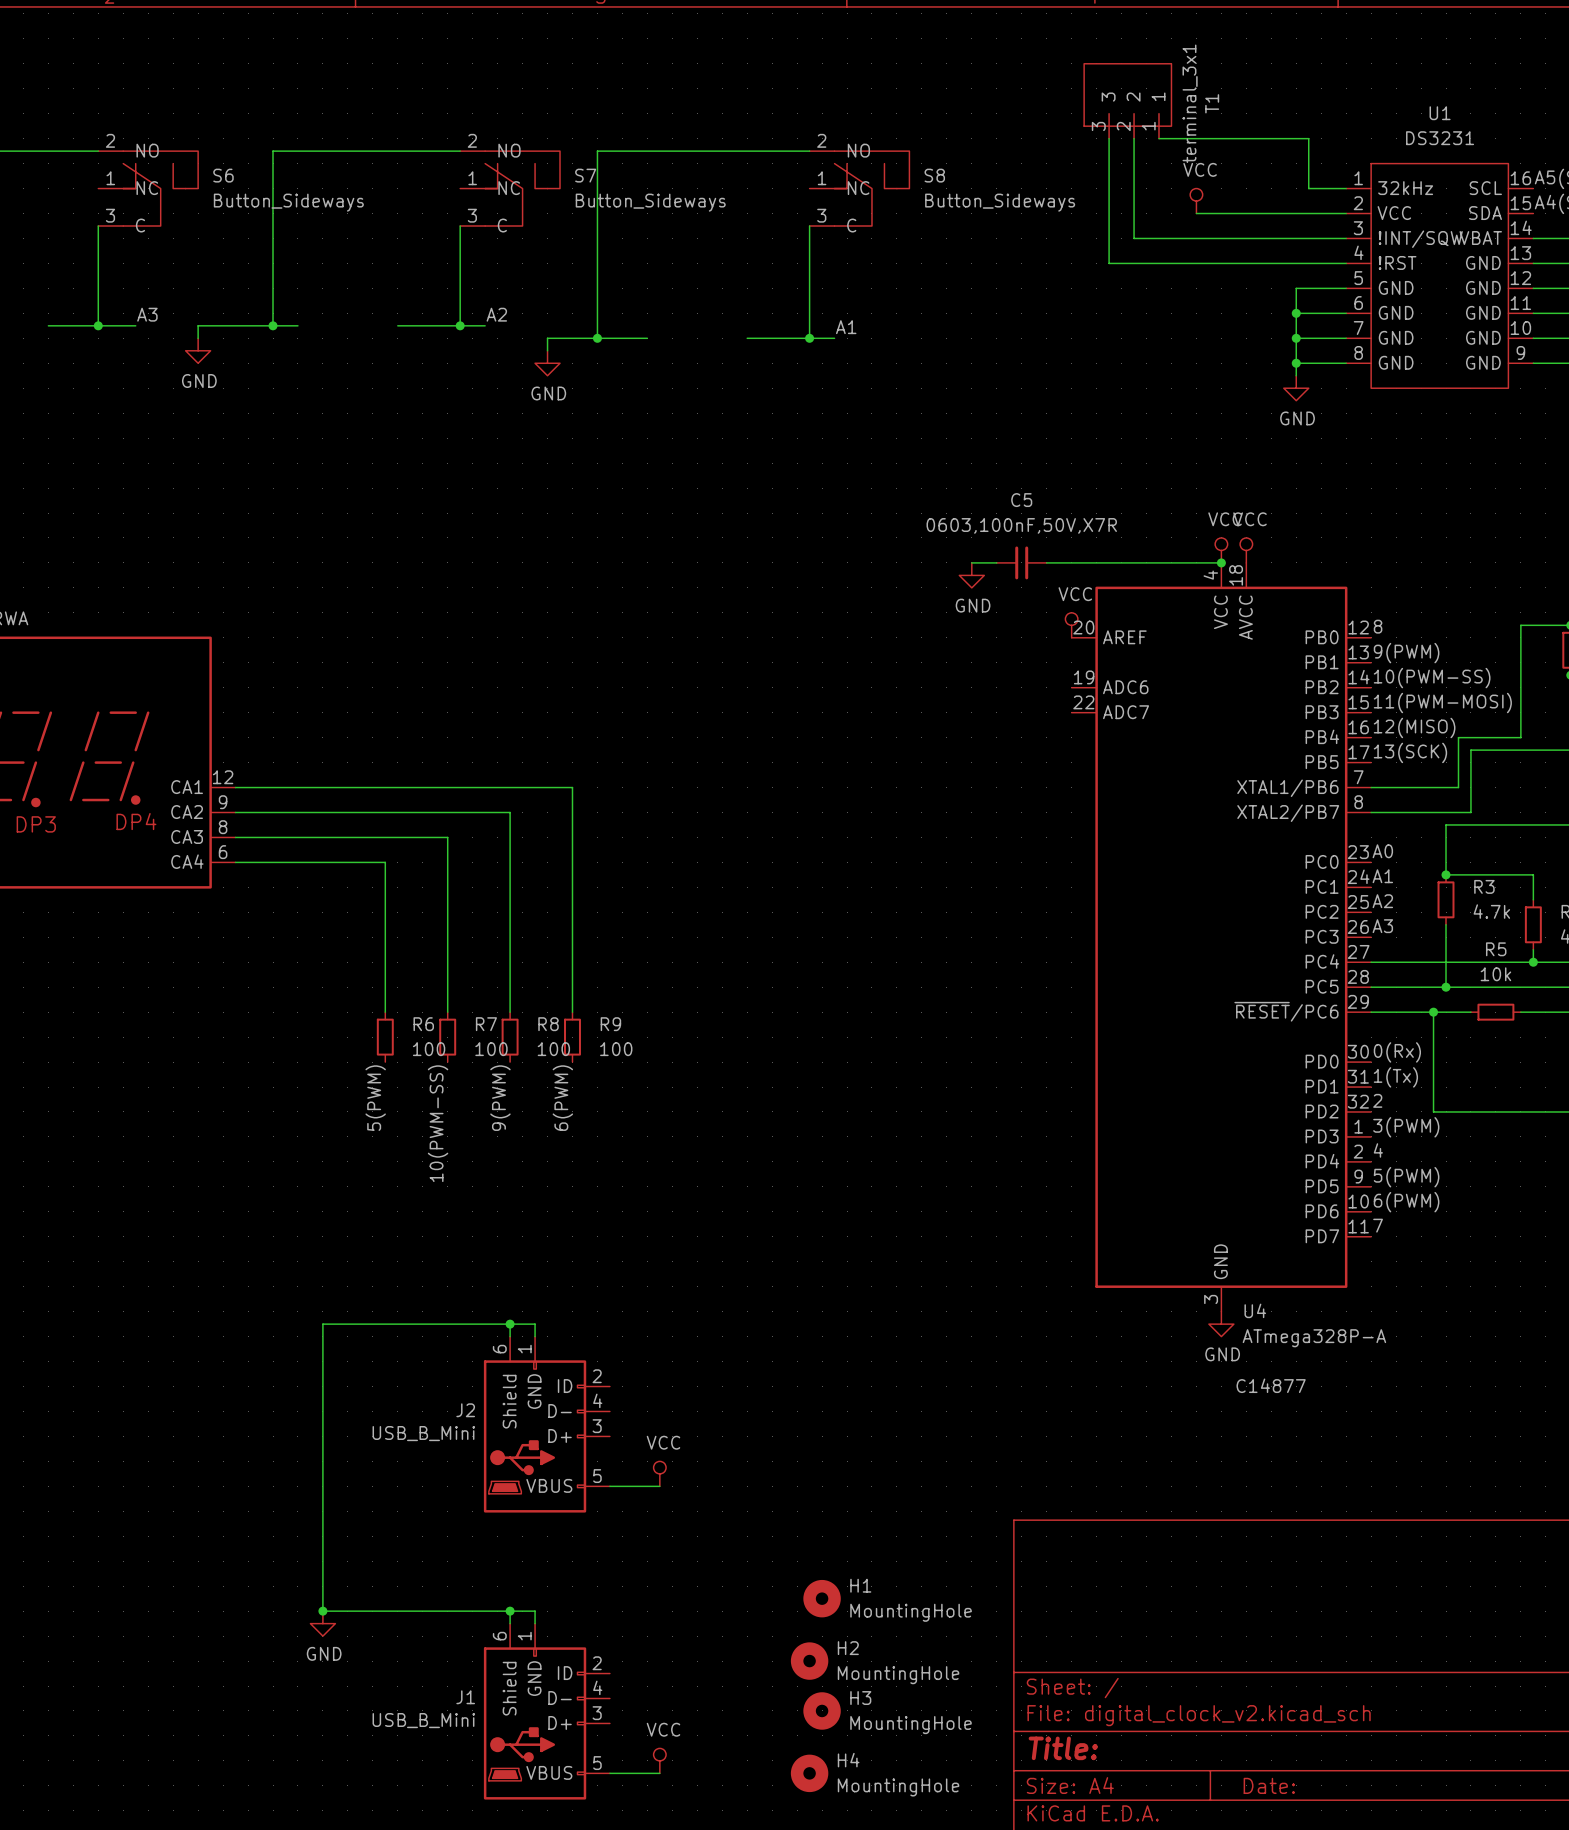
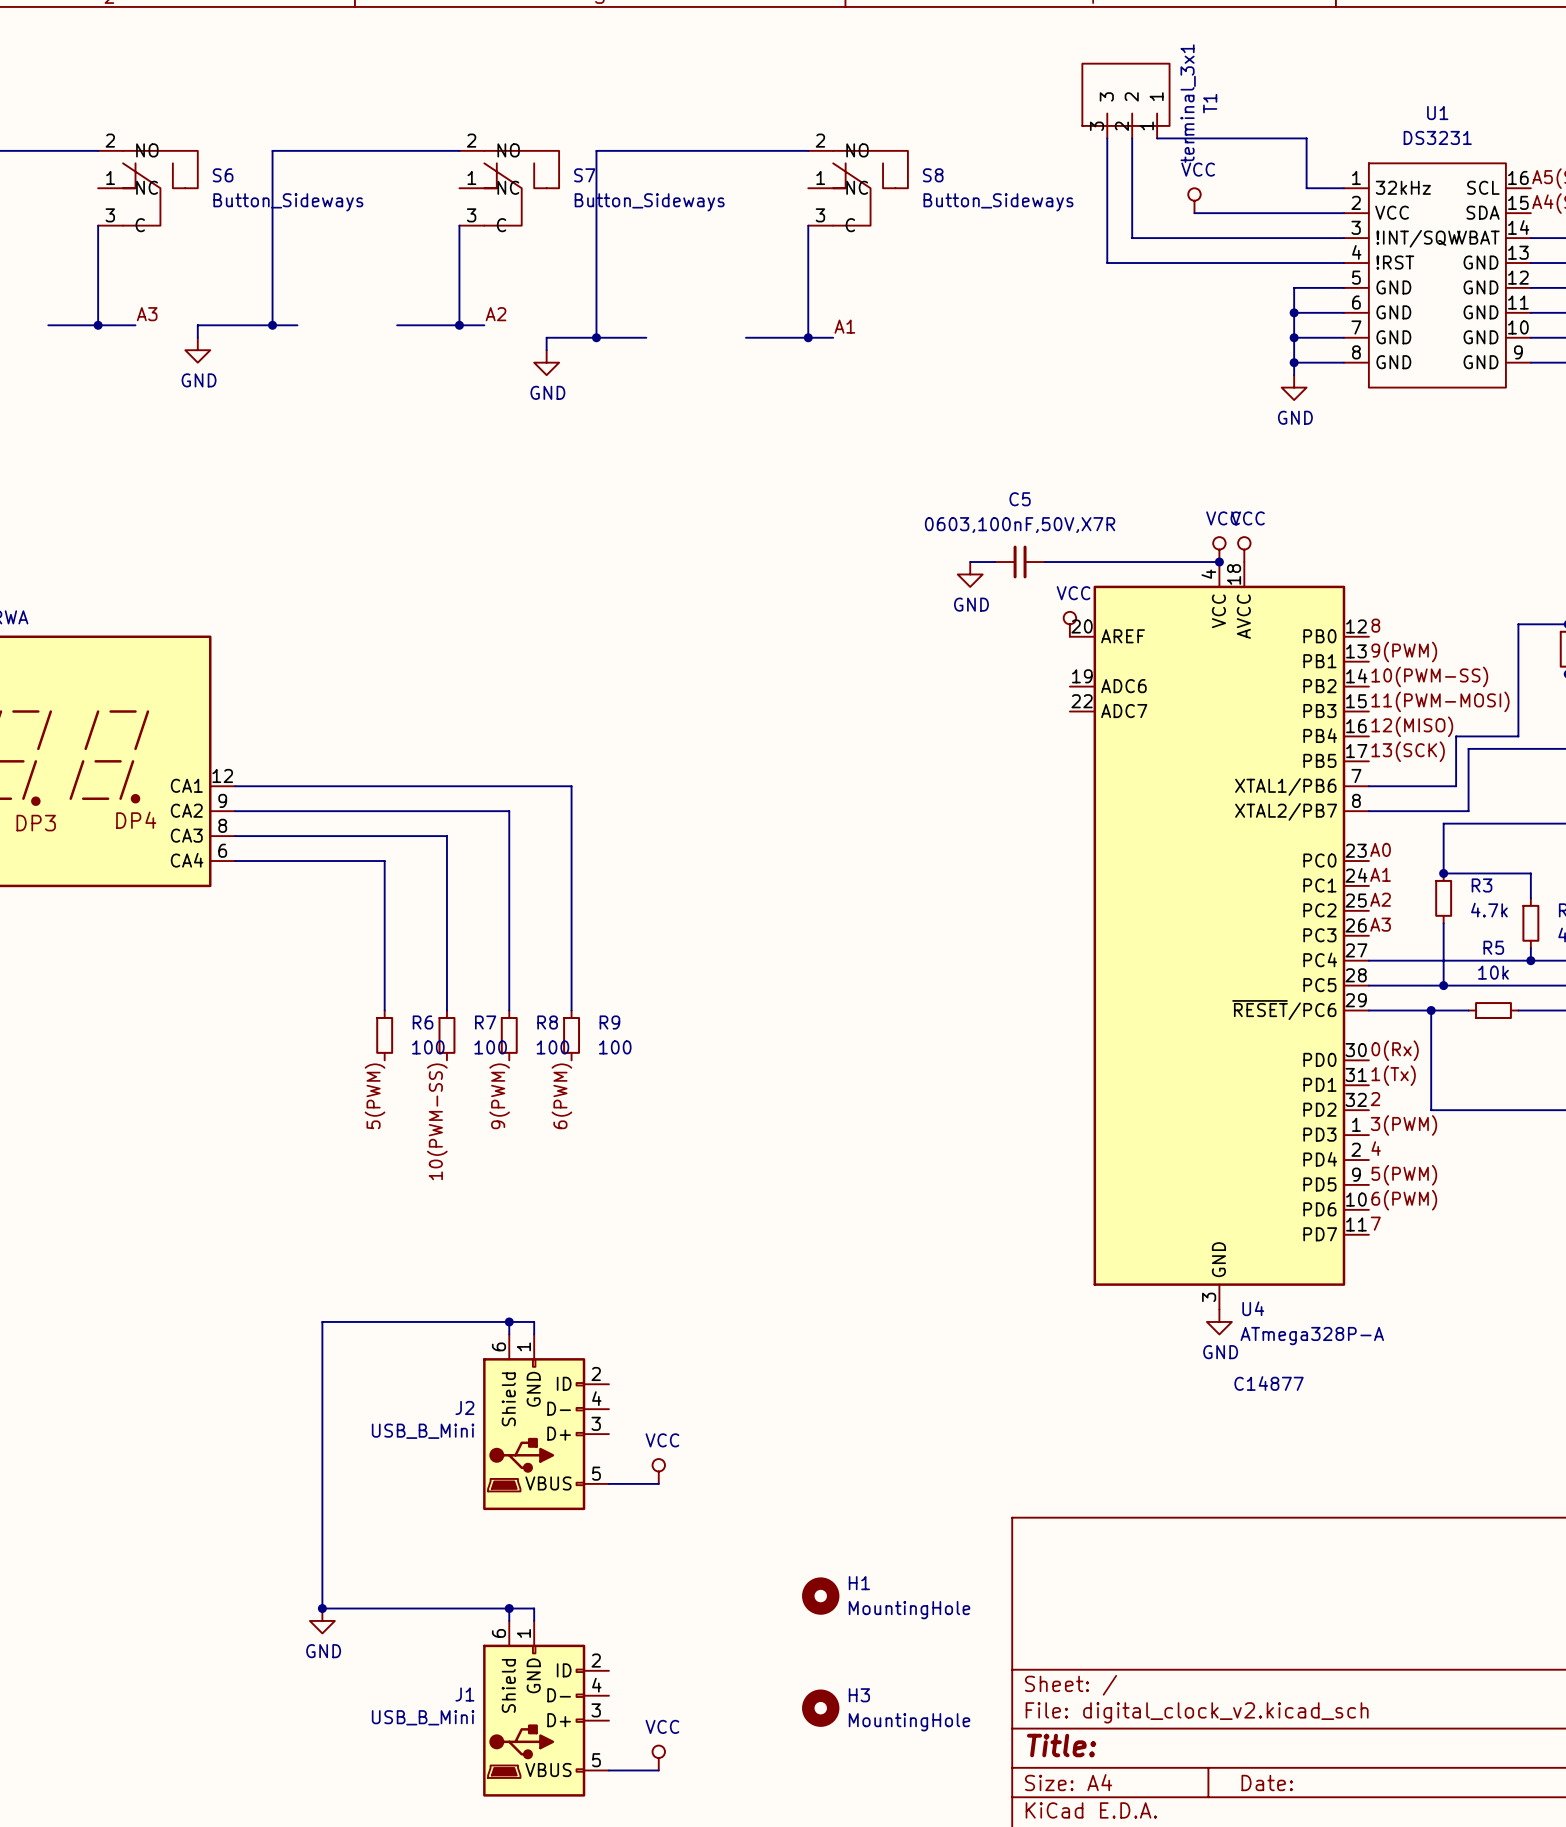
H2: MountingHole (809, 1661) -> none
H4: MountingHole (809, 1773) -> none

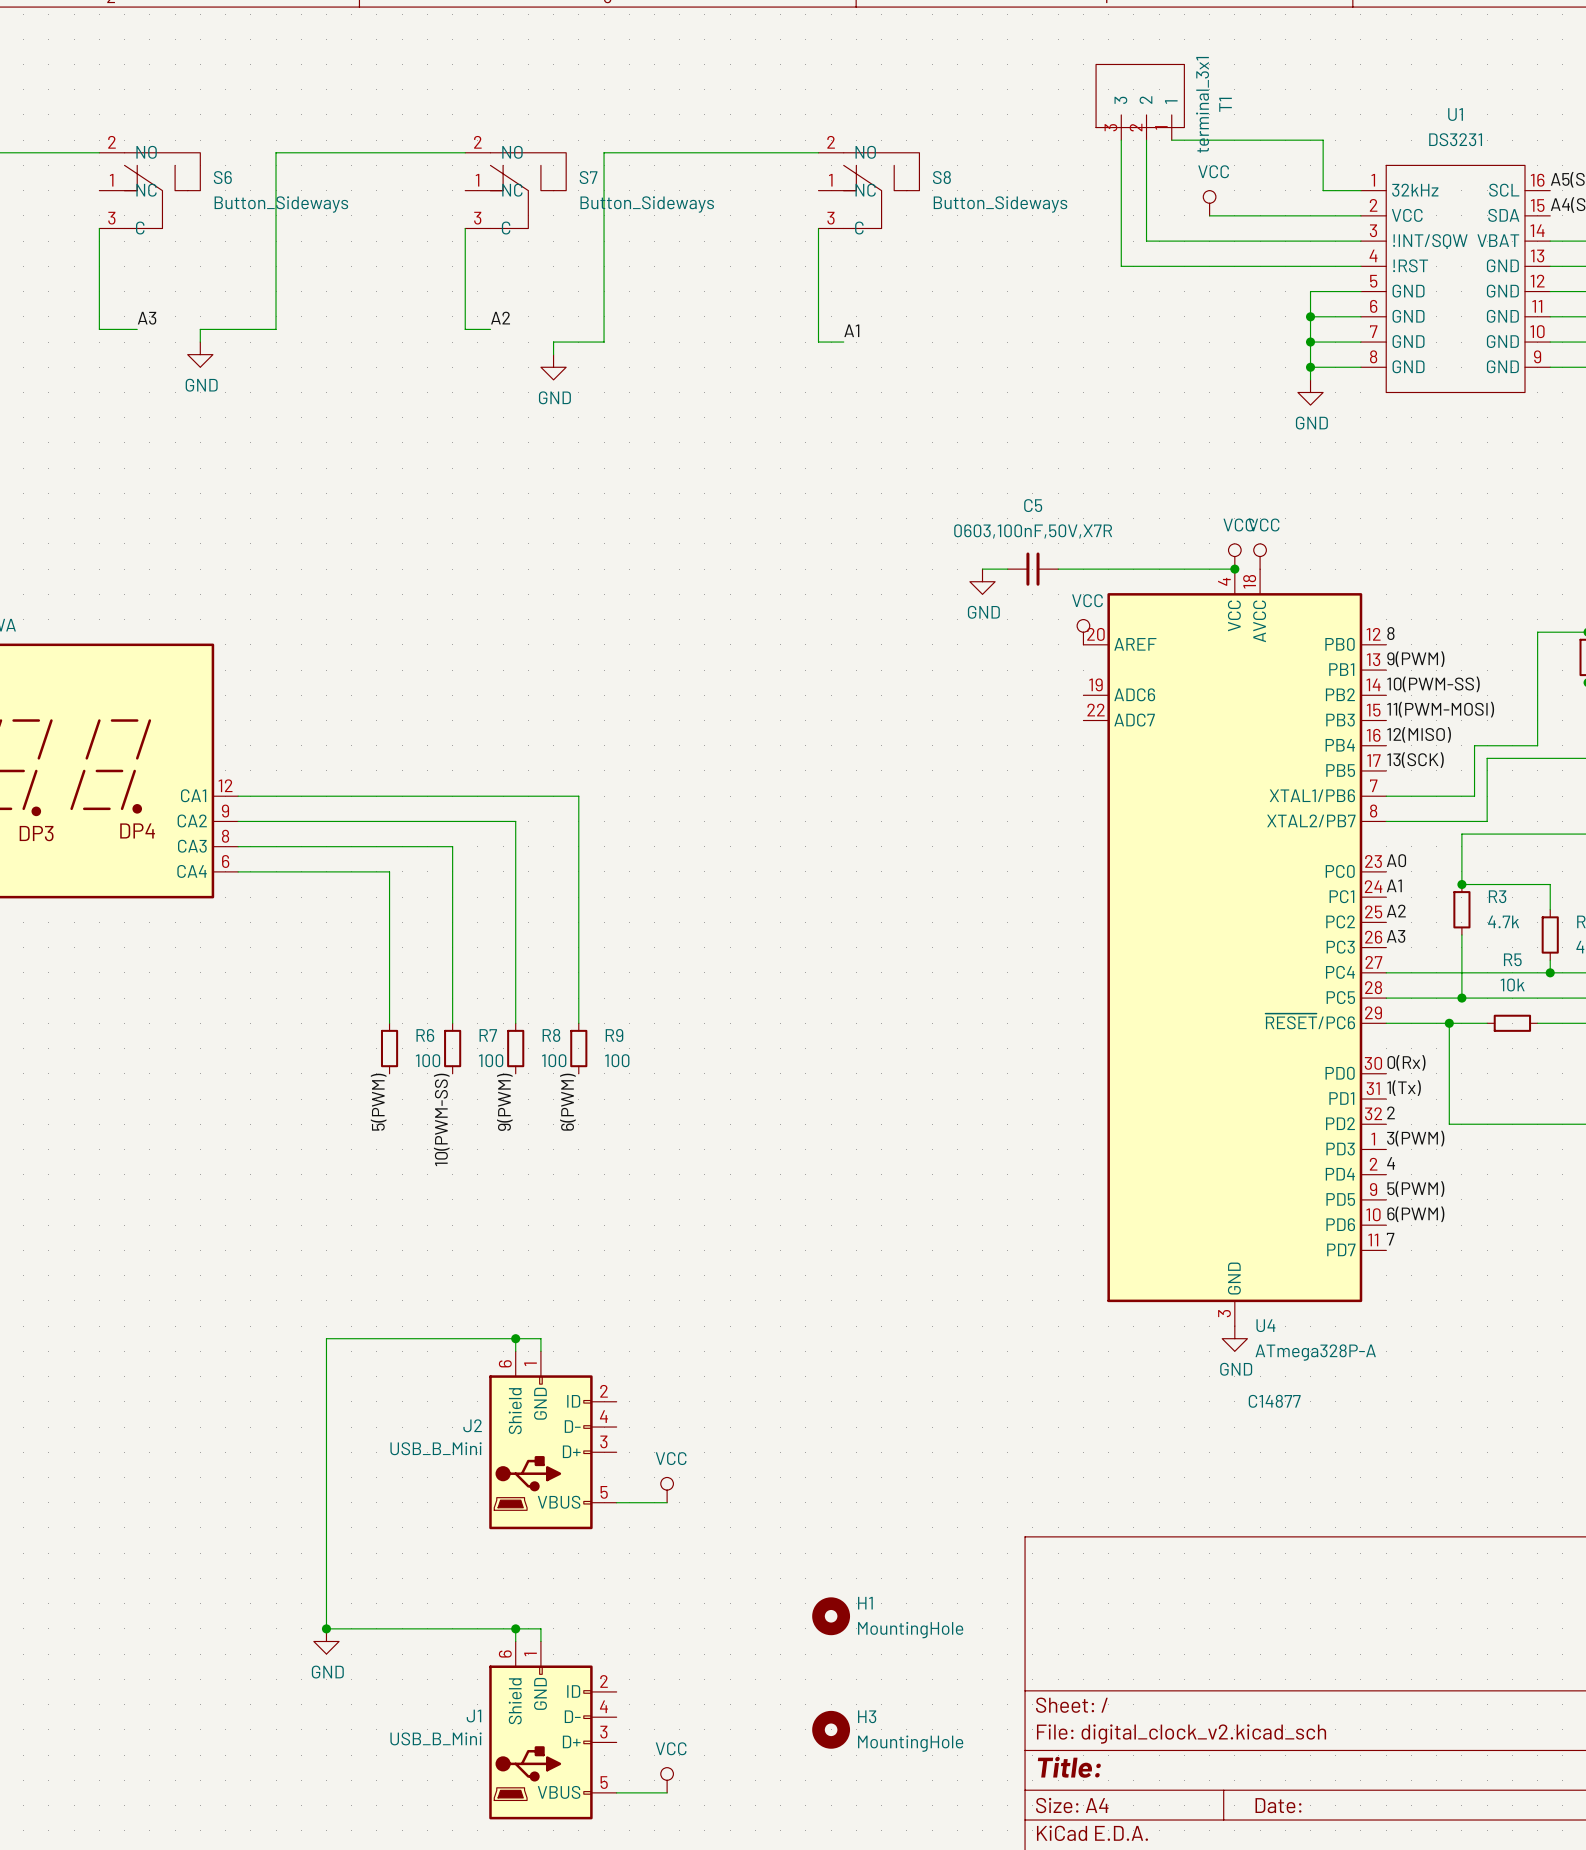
wire: (48, 325) (98, 325) -> none
junction: (98, 325) -> none
wire: (272, 325) (297, 325) -> none
junction: (272, 325) -> none
wire: (397, 325) (459, 325) -> none
junction: (459, 325) -> none
wire: (596, 337) (646, 337) -> none
junction: (596, 337) -> none
wire: (745, 337) (808, 337) -> none
junction: (808, 337) -> none

